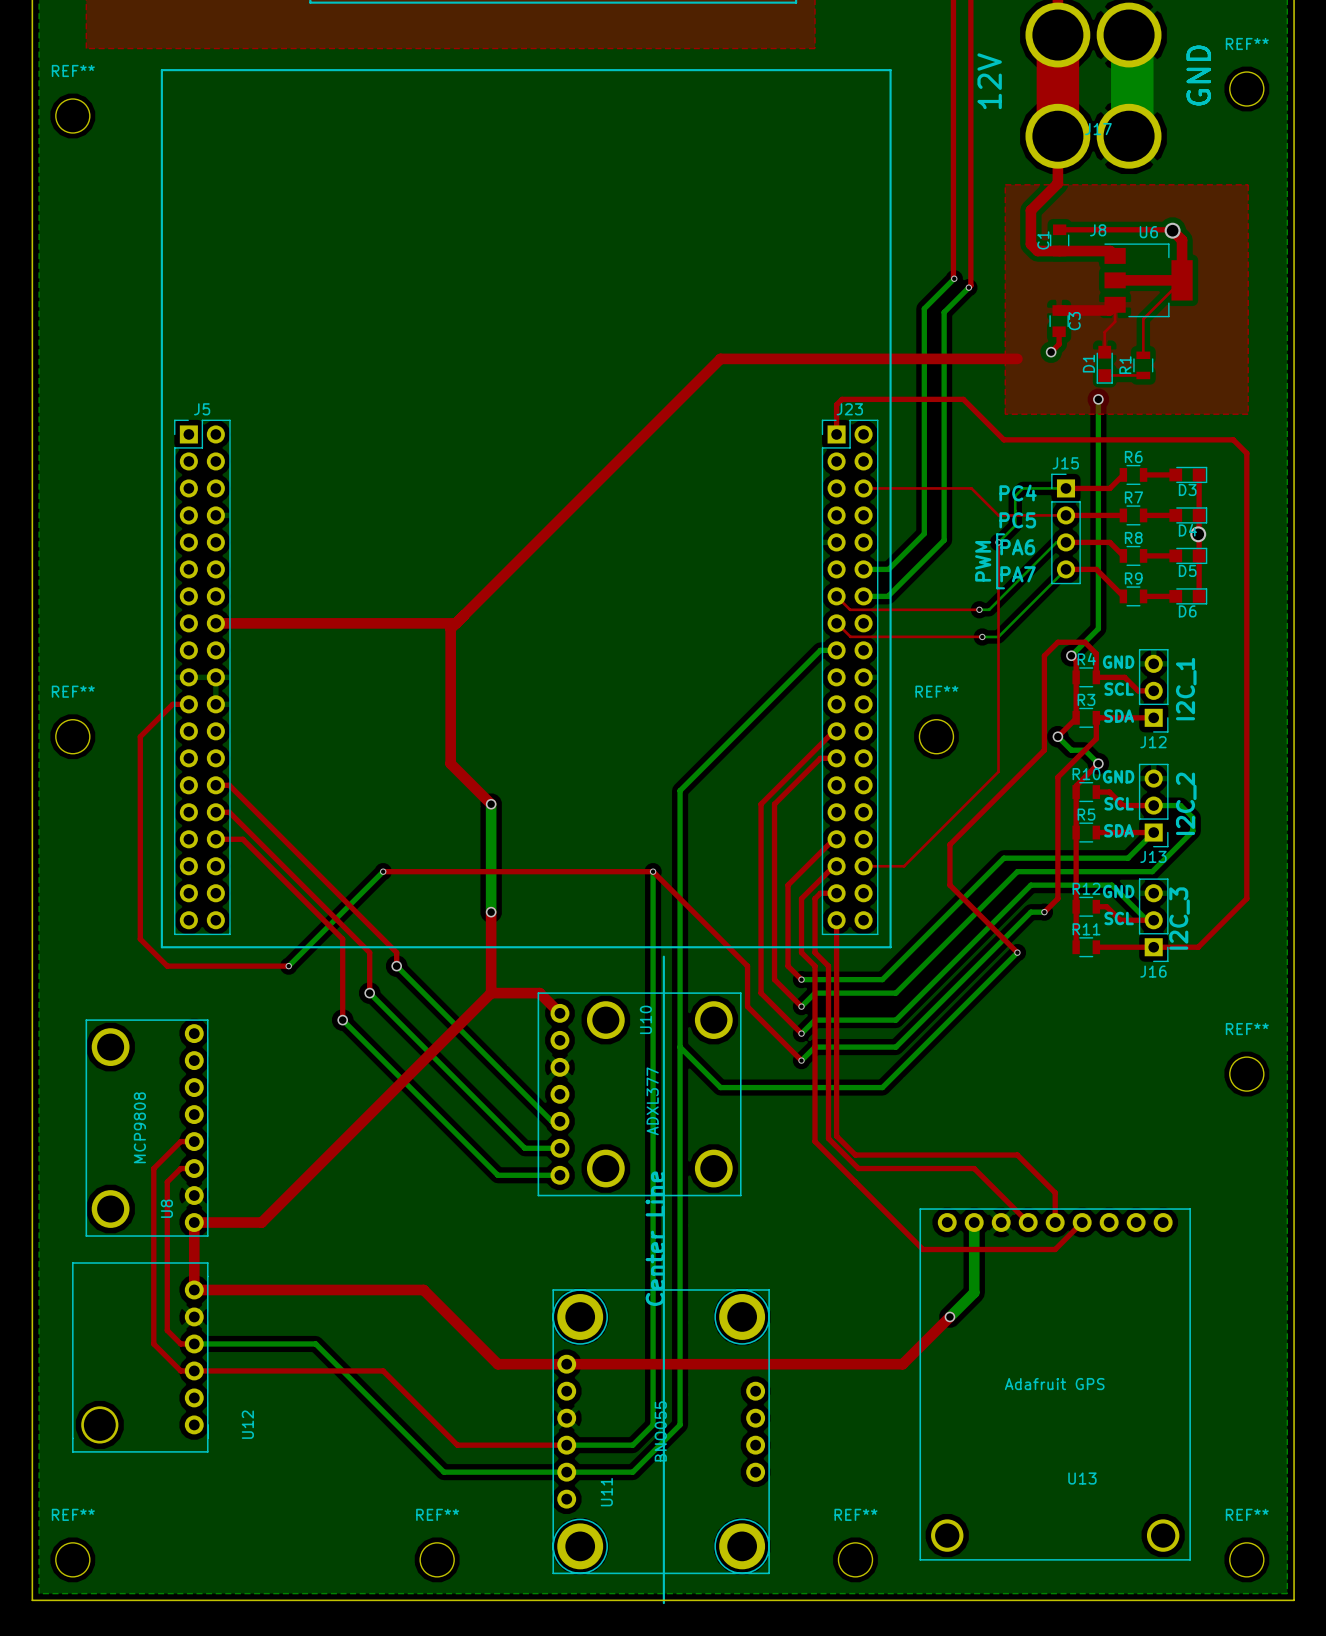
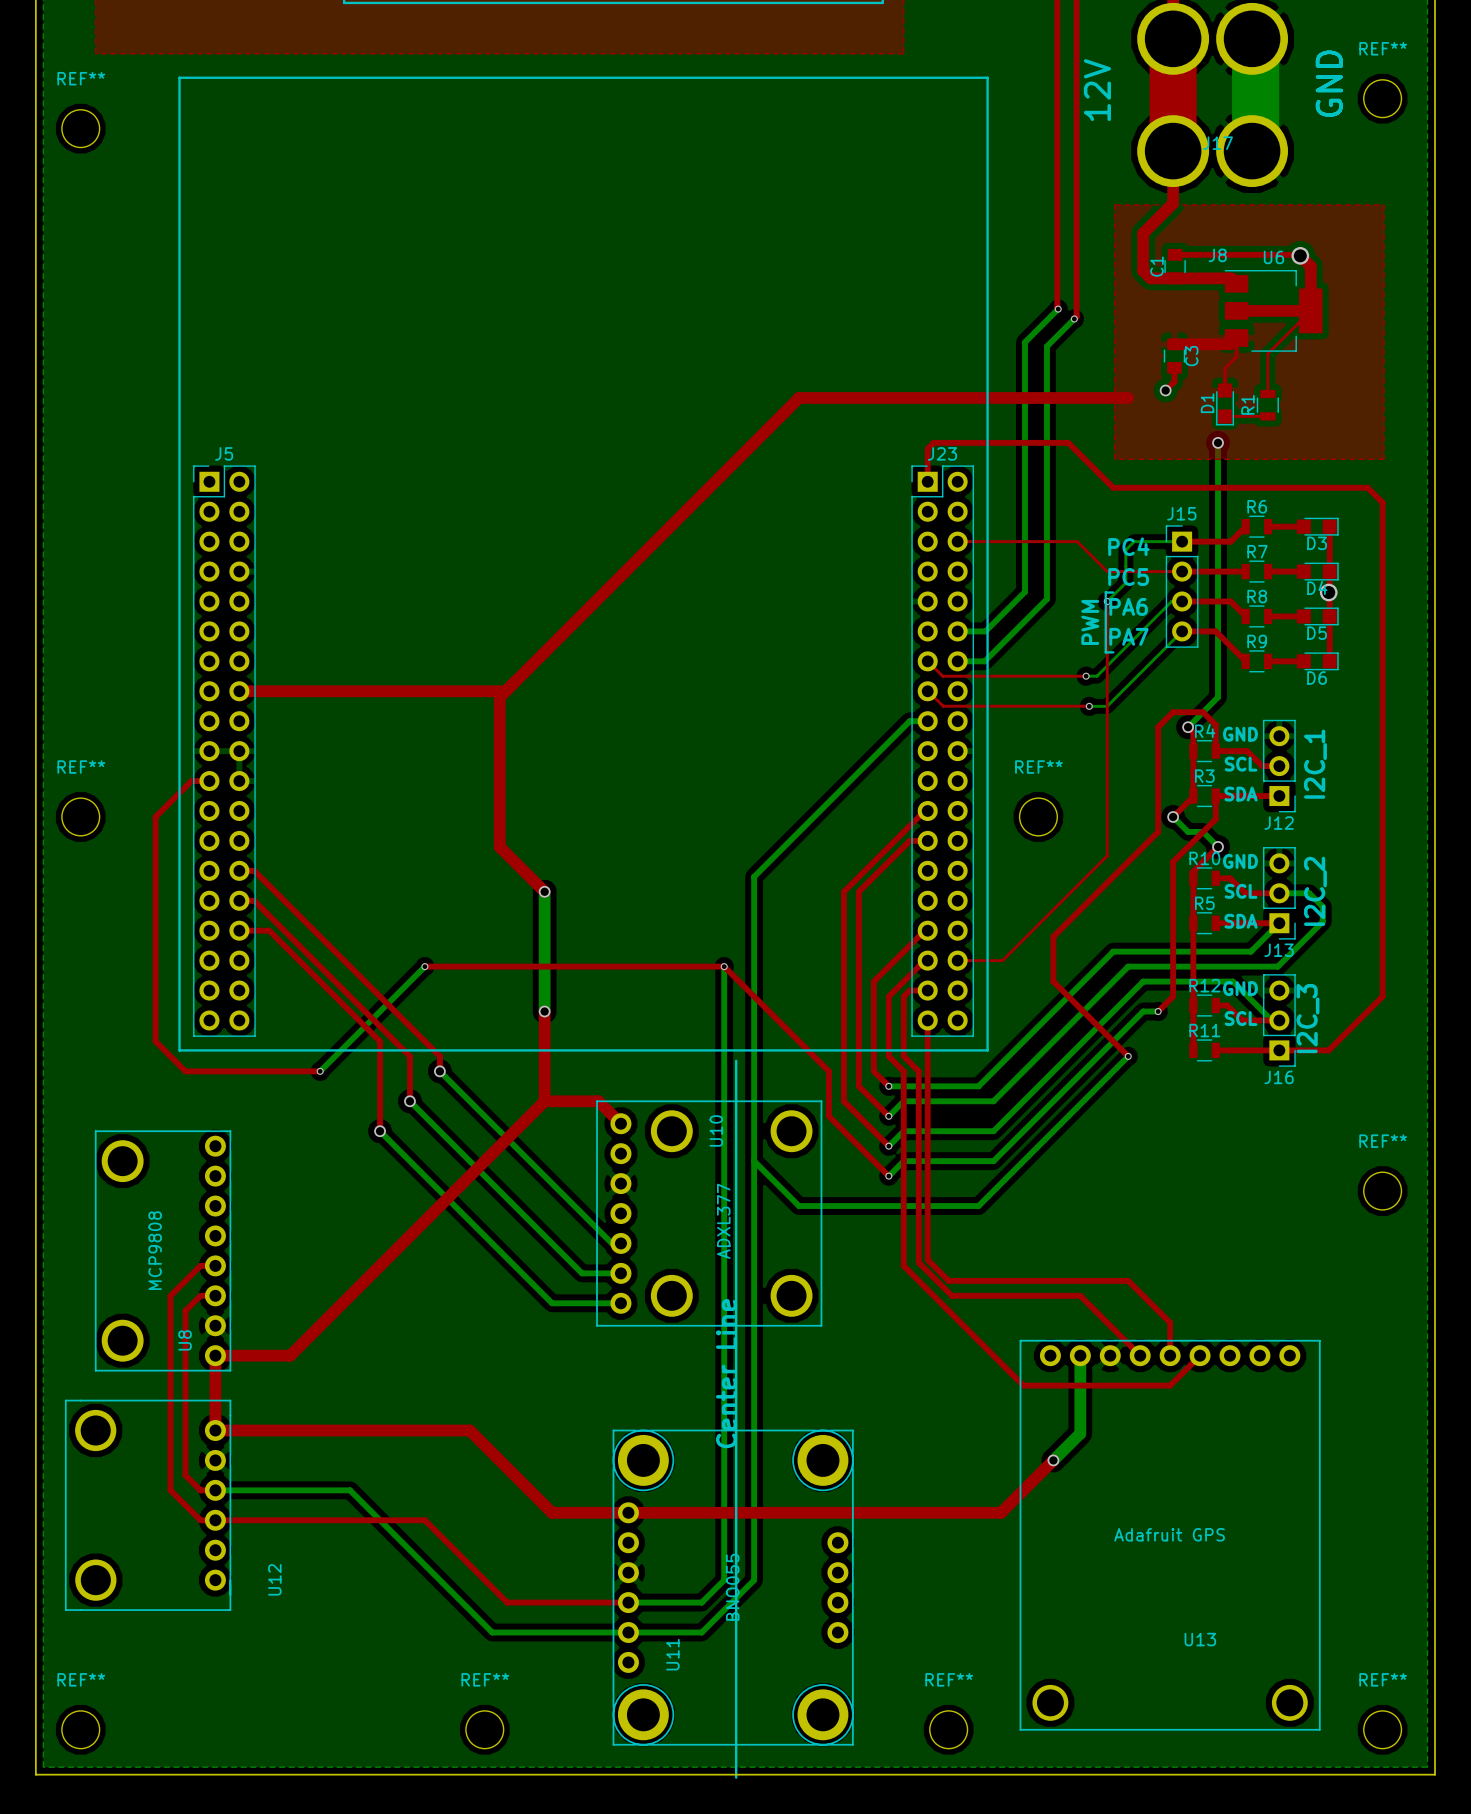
U12 footprint: [72, 1262, 209, 1453] -> [64, 1399, 232, 1611]

